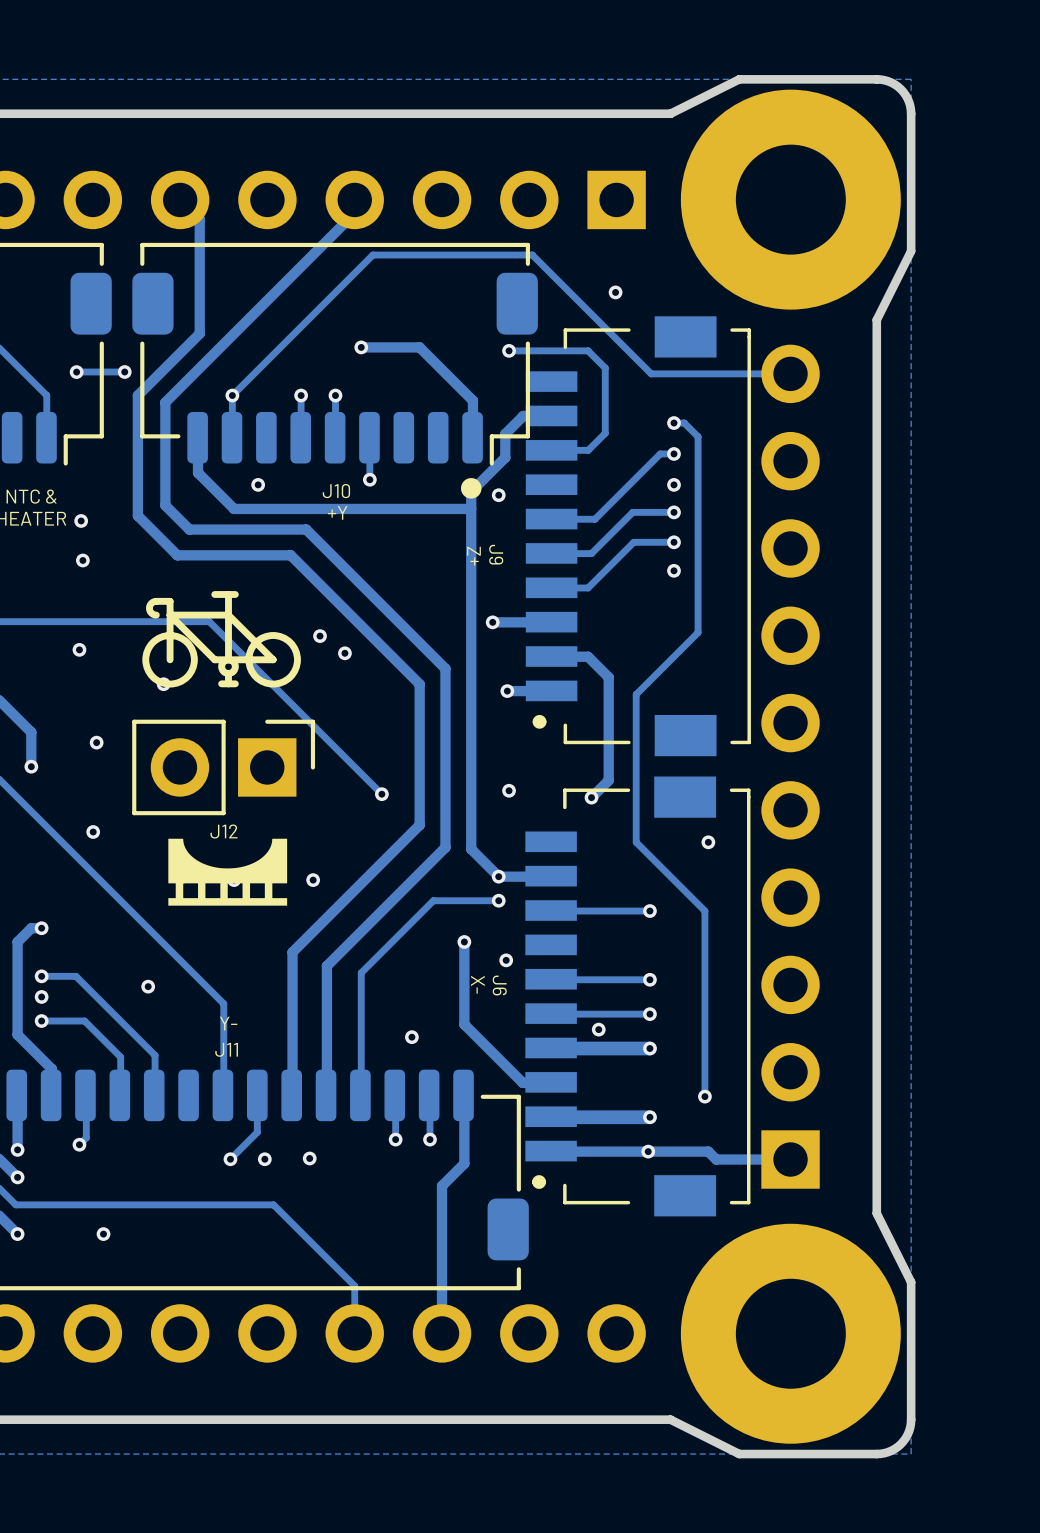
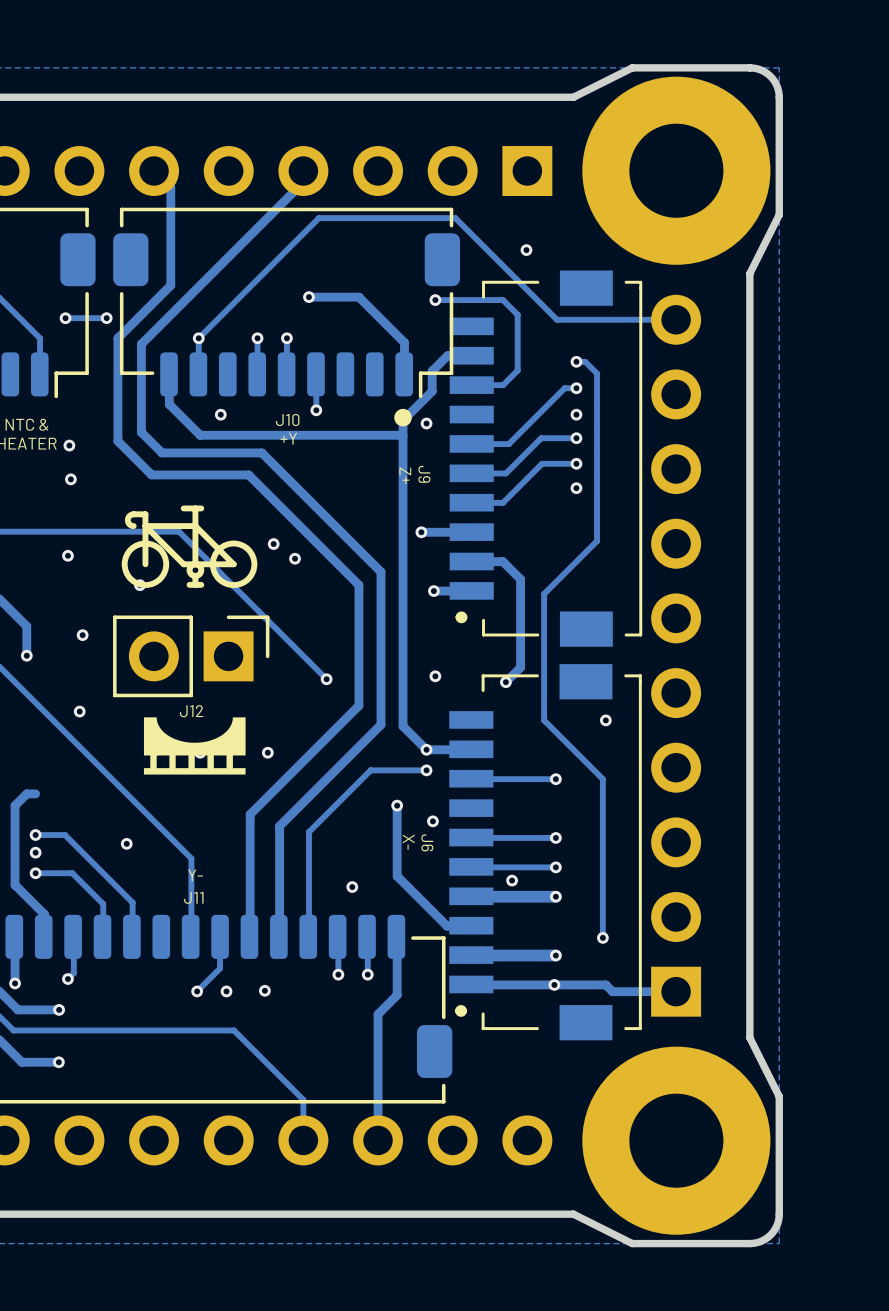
via: (41, 928) -> none
track: none -> (15, 1006) (17, 1009) (59, 1009)
via: (17, 1177) -> none
via: none -> (59, 1009)
track: none -> (15, 1055) (21, 1062) (58, 1062)
via: (17, 1234) -> none
via: (103, 1234) -> none
via: none -> (58, 1062)

